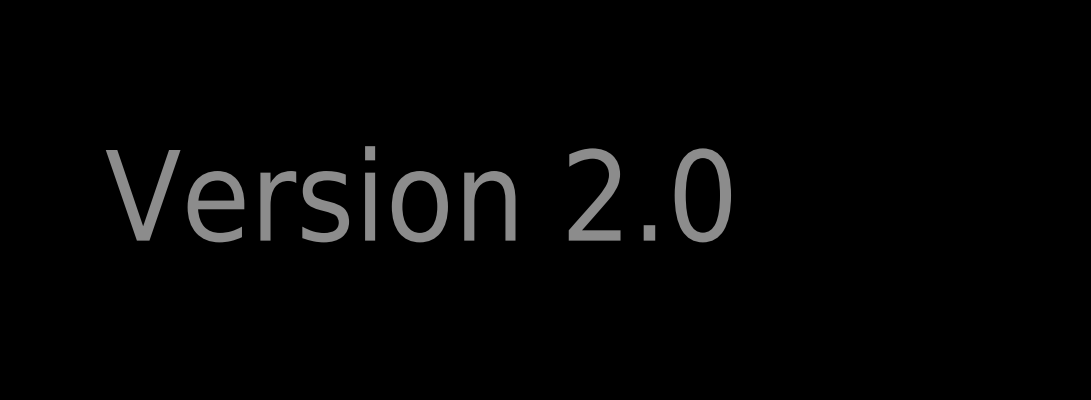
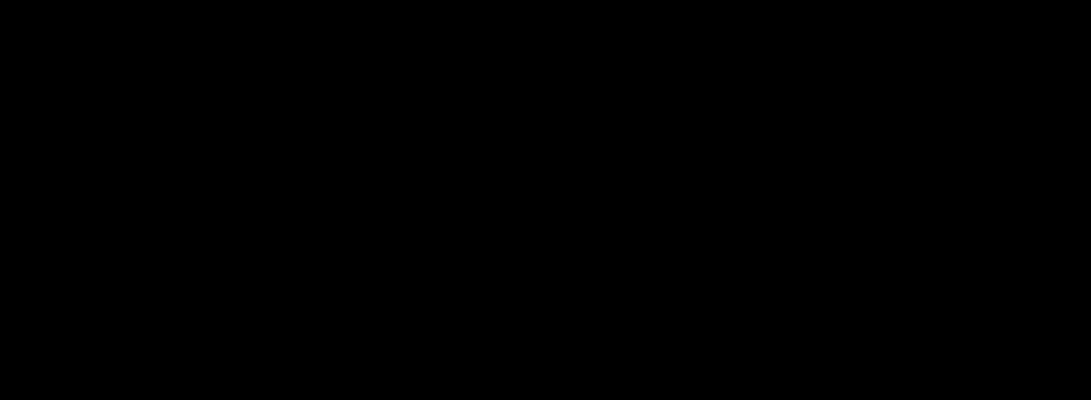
text: Version 2.0 (418, 194) -> none

